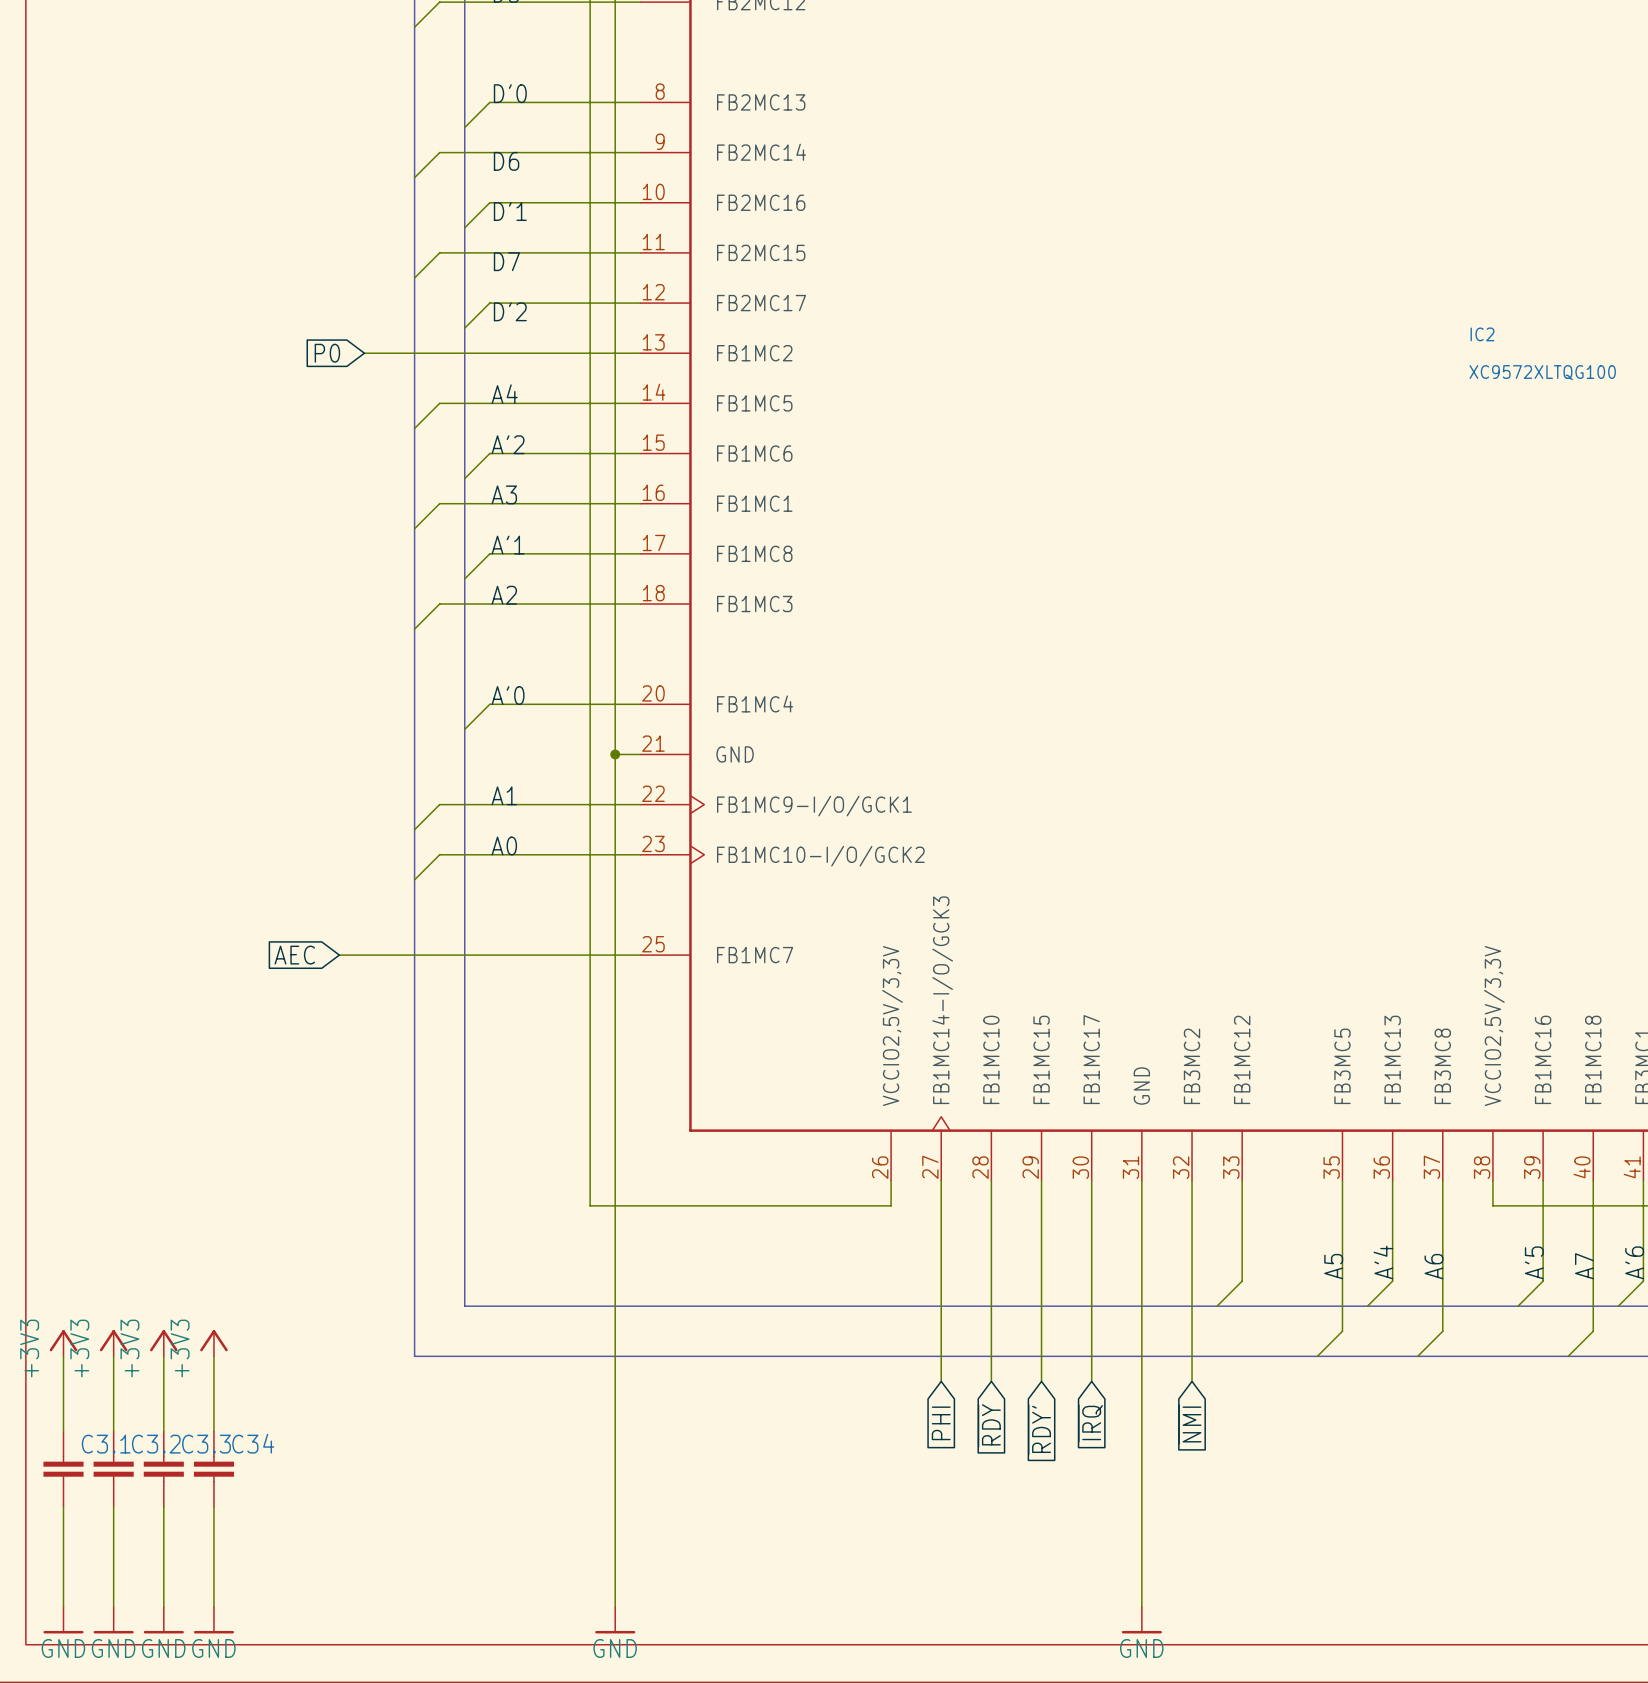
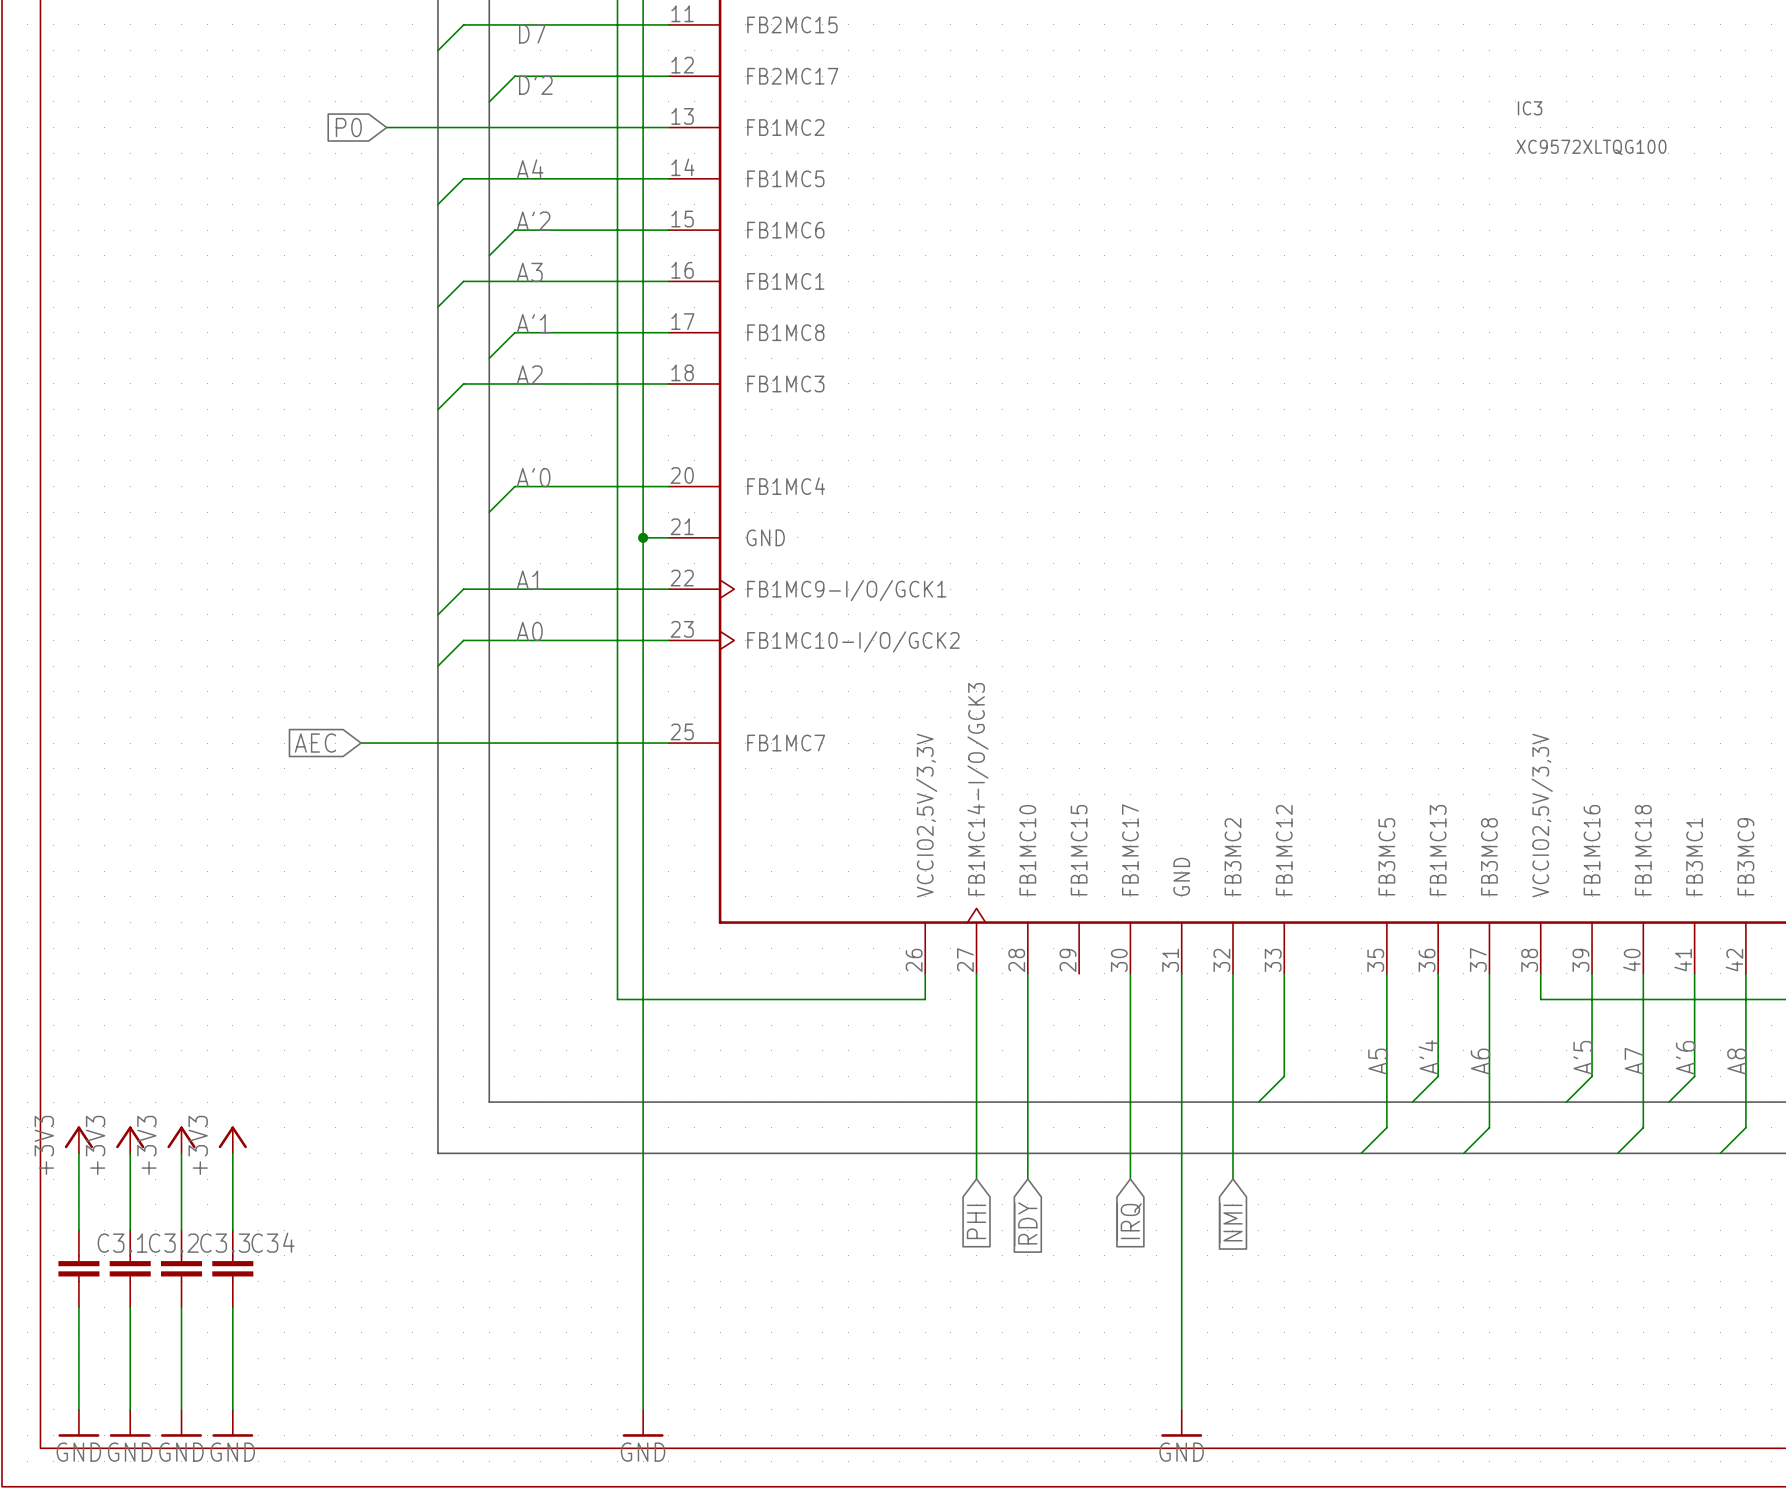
IC2 name: IC2 (1482, 334) -> IC3 (1530, 108)
wire: (1041, 1180) (1041, 1381) -> none
global label: ~{RDY'} (1039, 1429) -> none

